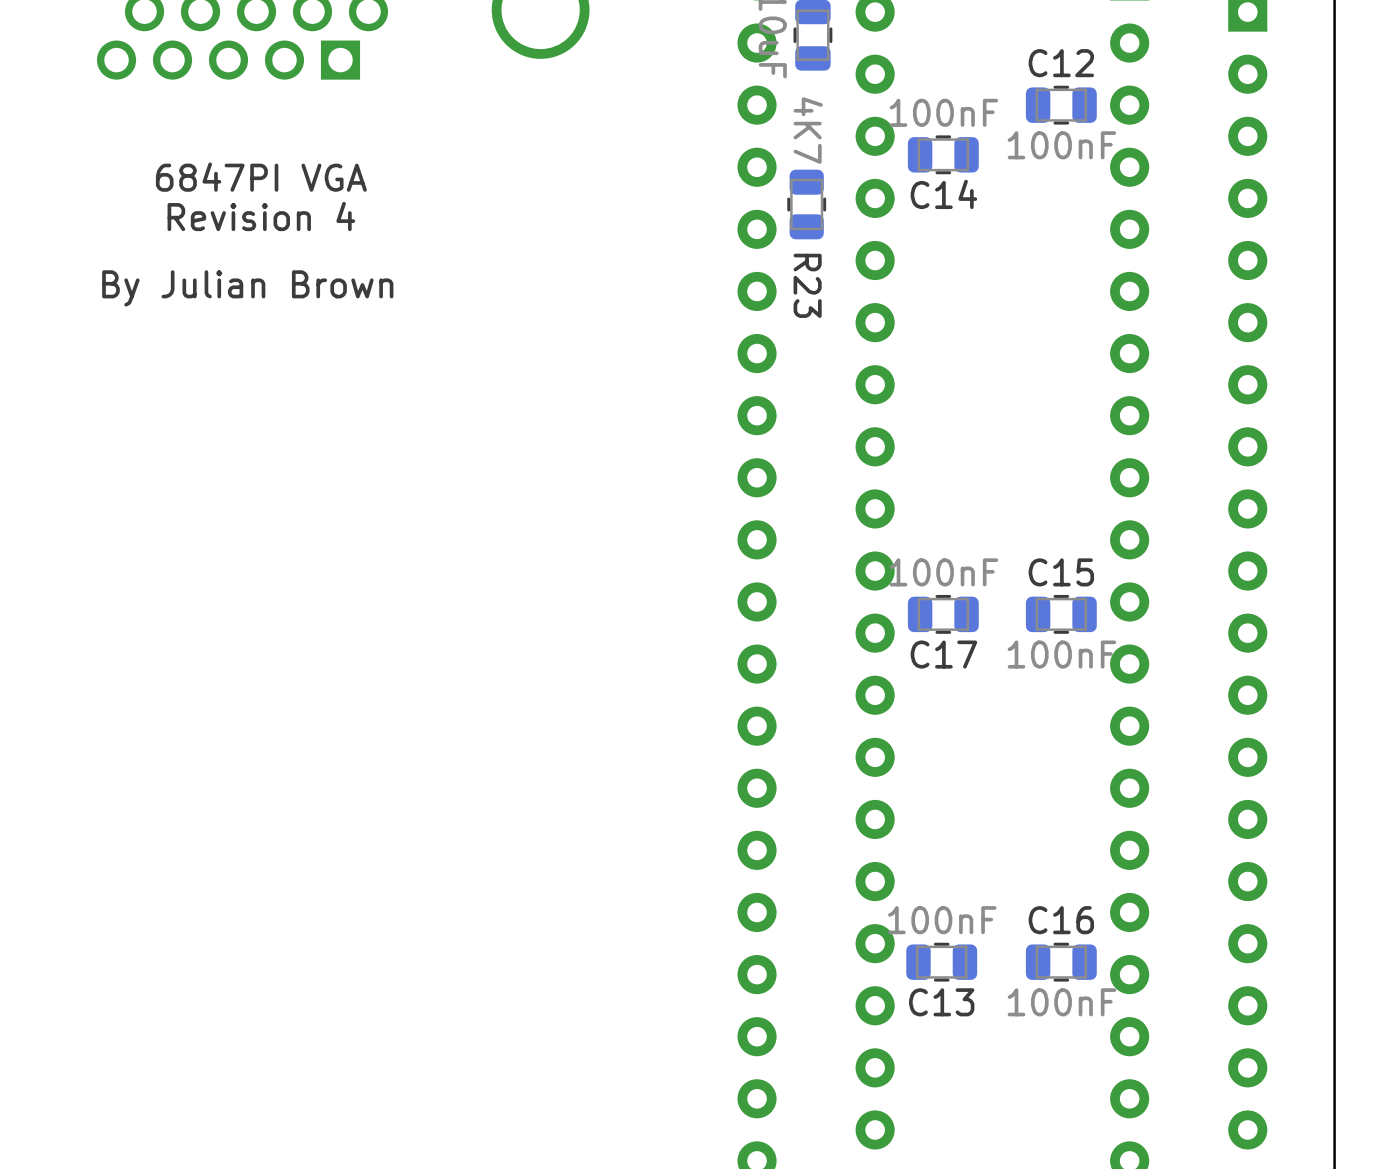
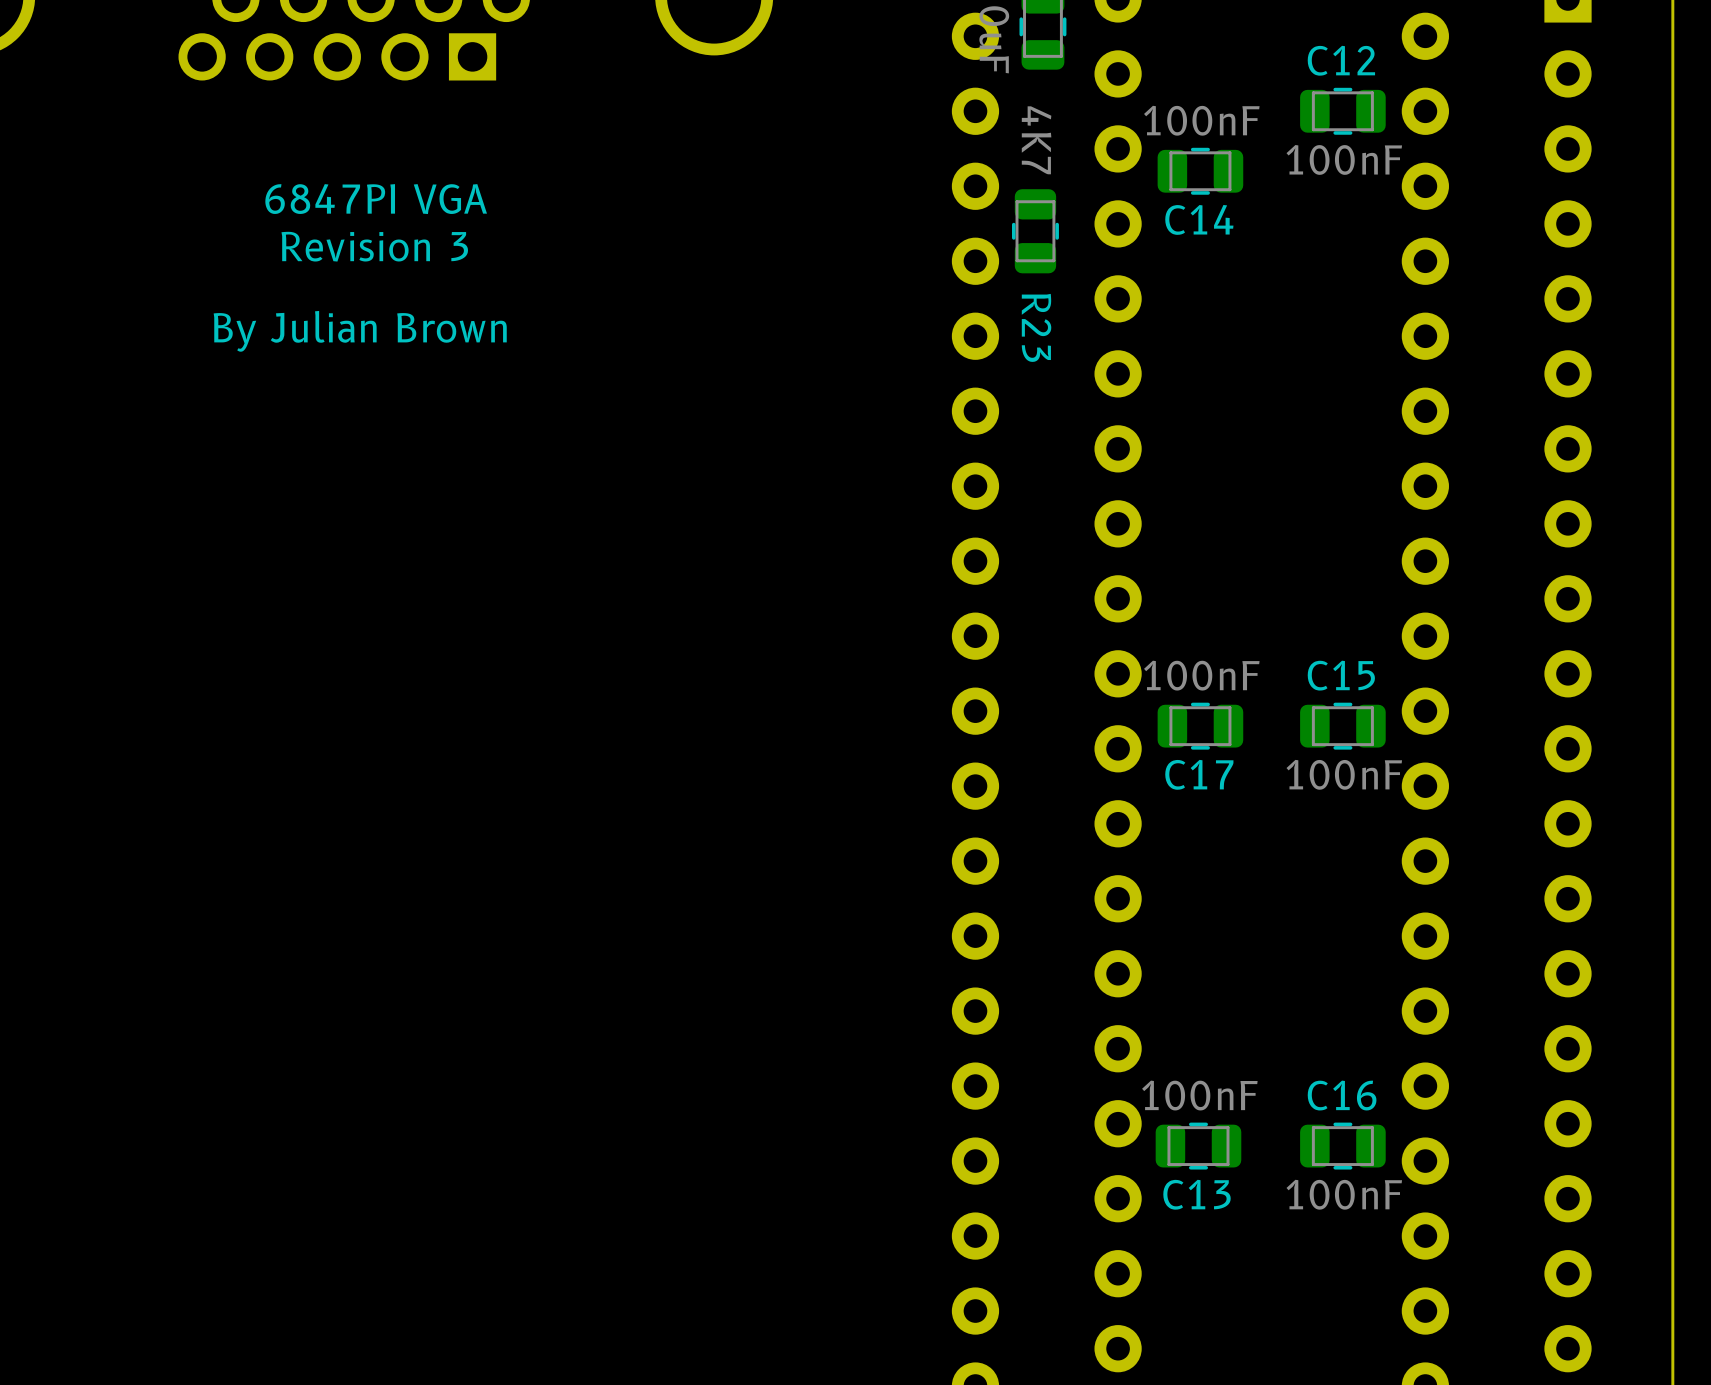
text: Revision 4 (261, 216) -> Revision 3 (374, 246)

